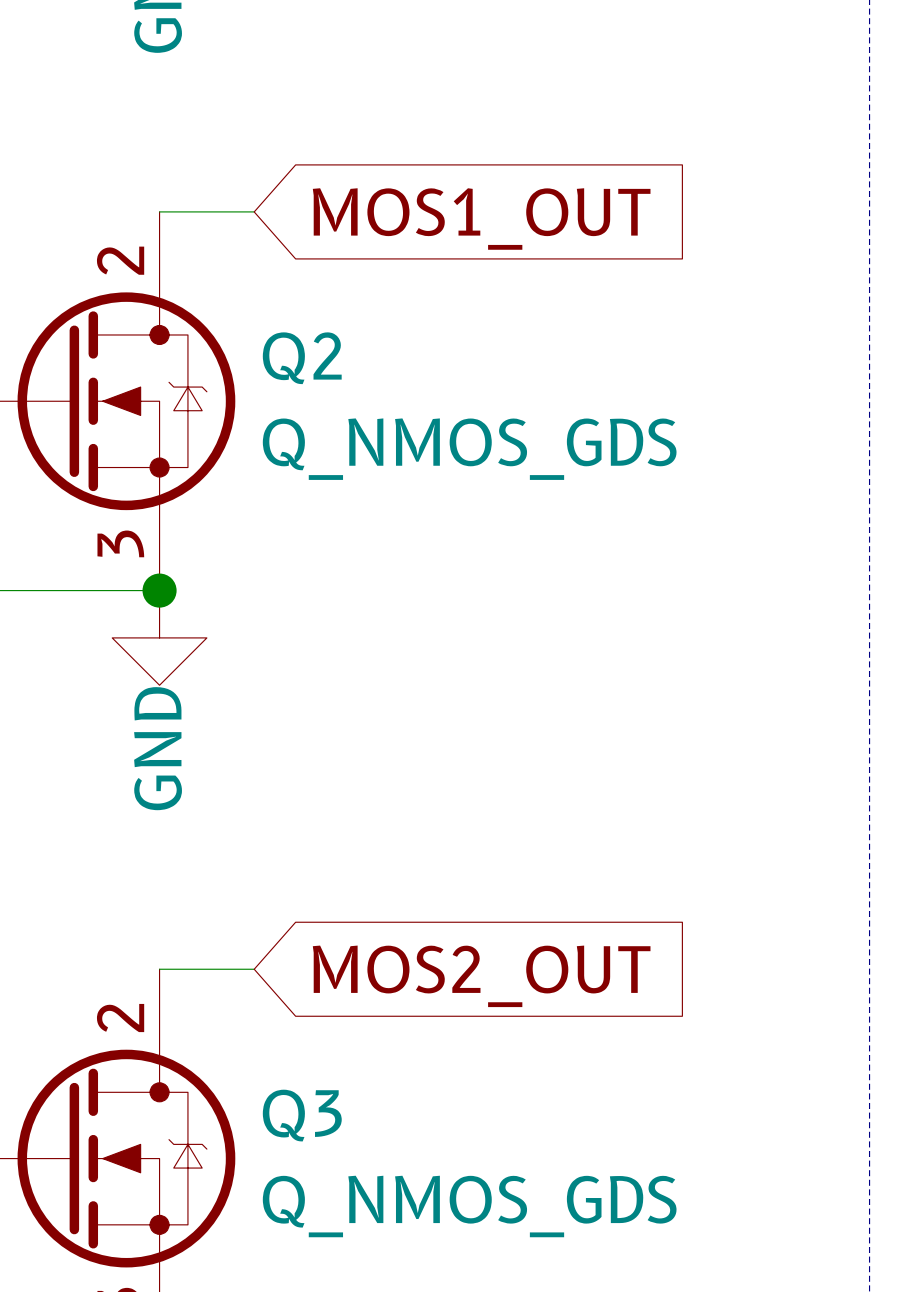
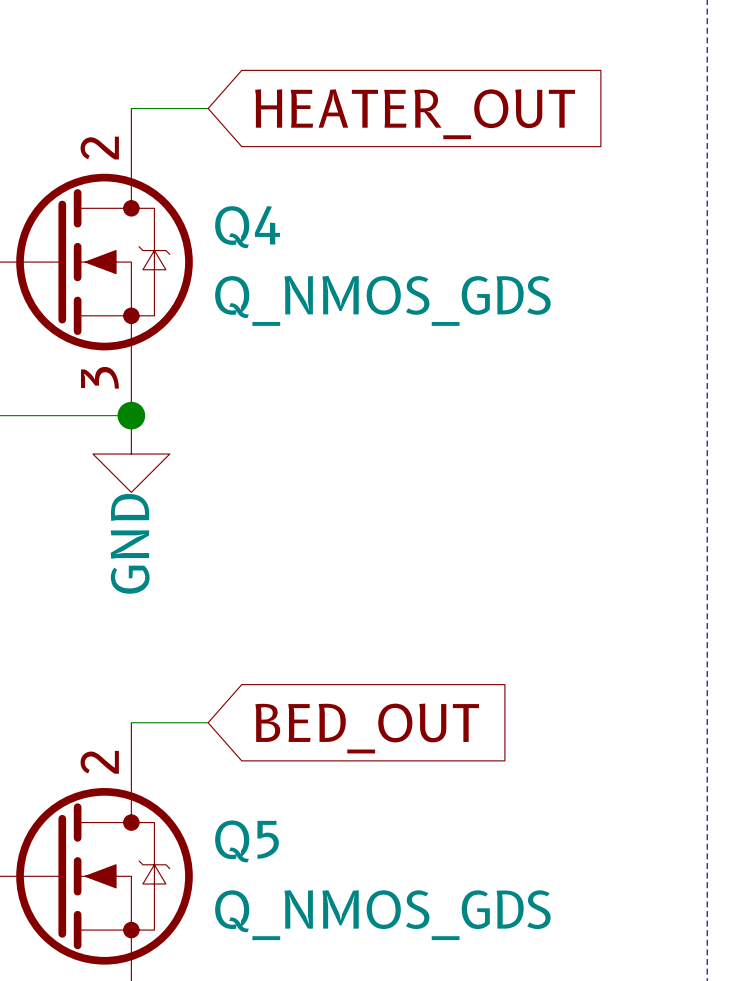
global label: MOS1_OUT (481, 219) -> HEATER_OUT (415, 114)
Q2 name: Q2 (302, 358) -> Q4 (247, 227)
global label: MOS2_OUT (481, 976) -> BED_OUT (367, 728)
Q3 name: Q3 (302, 1115) -> Q5 (247, 841)

